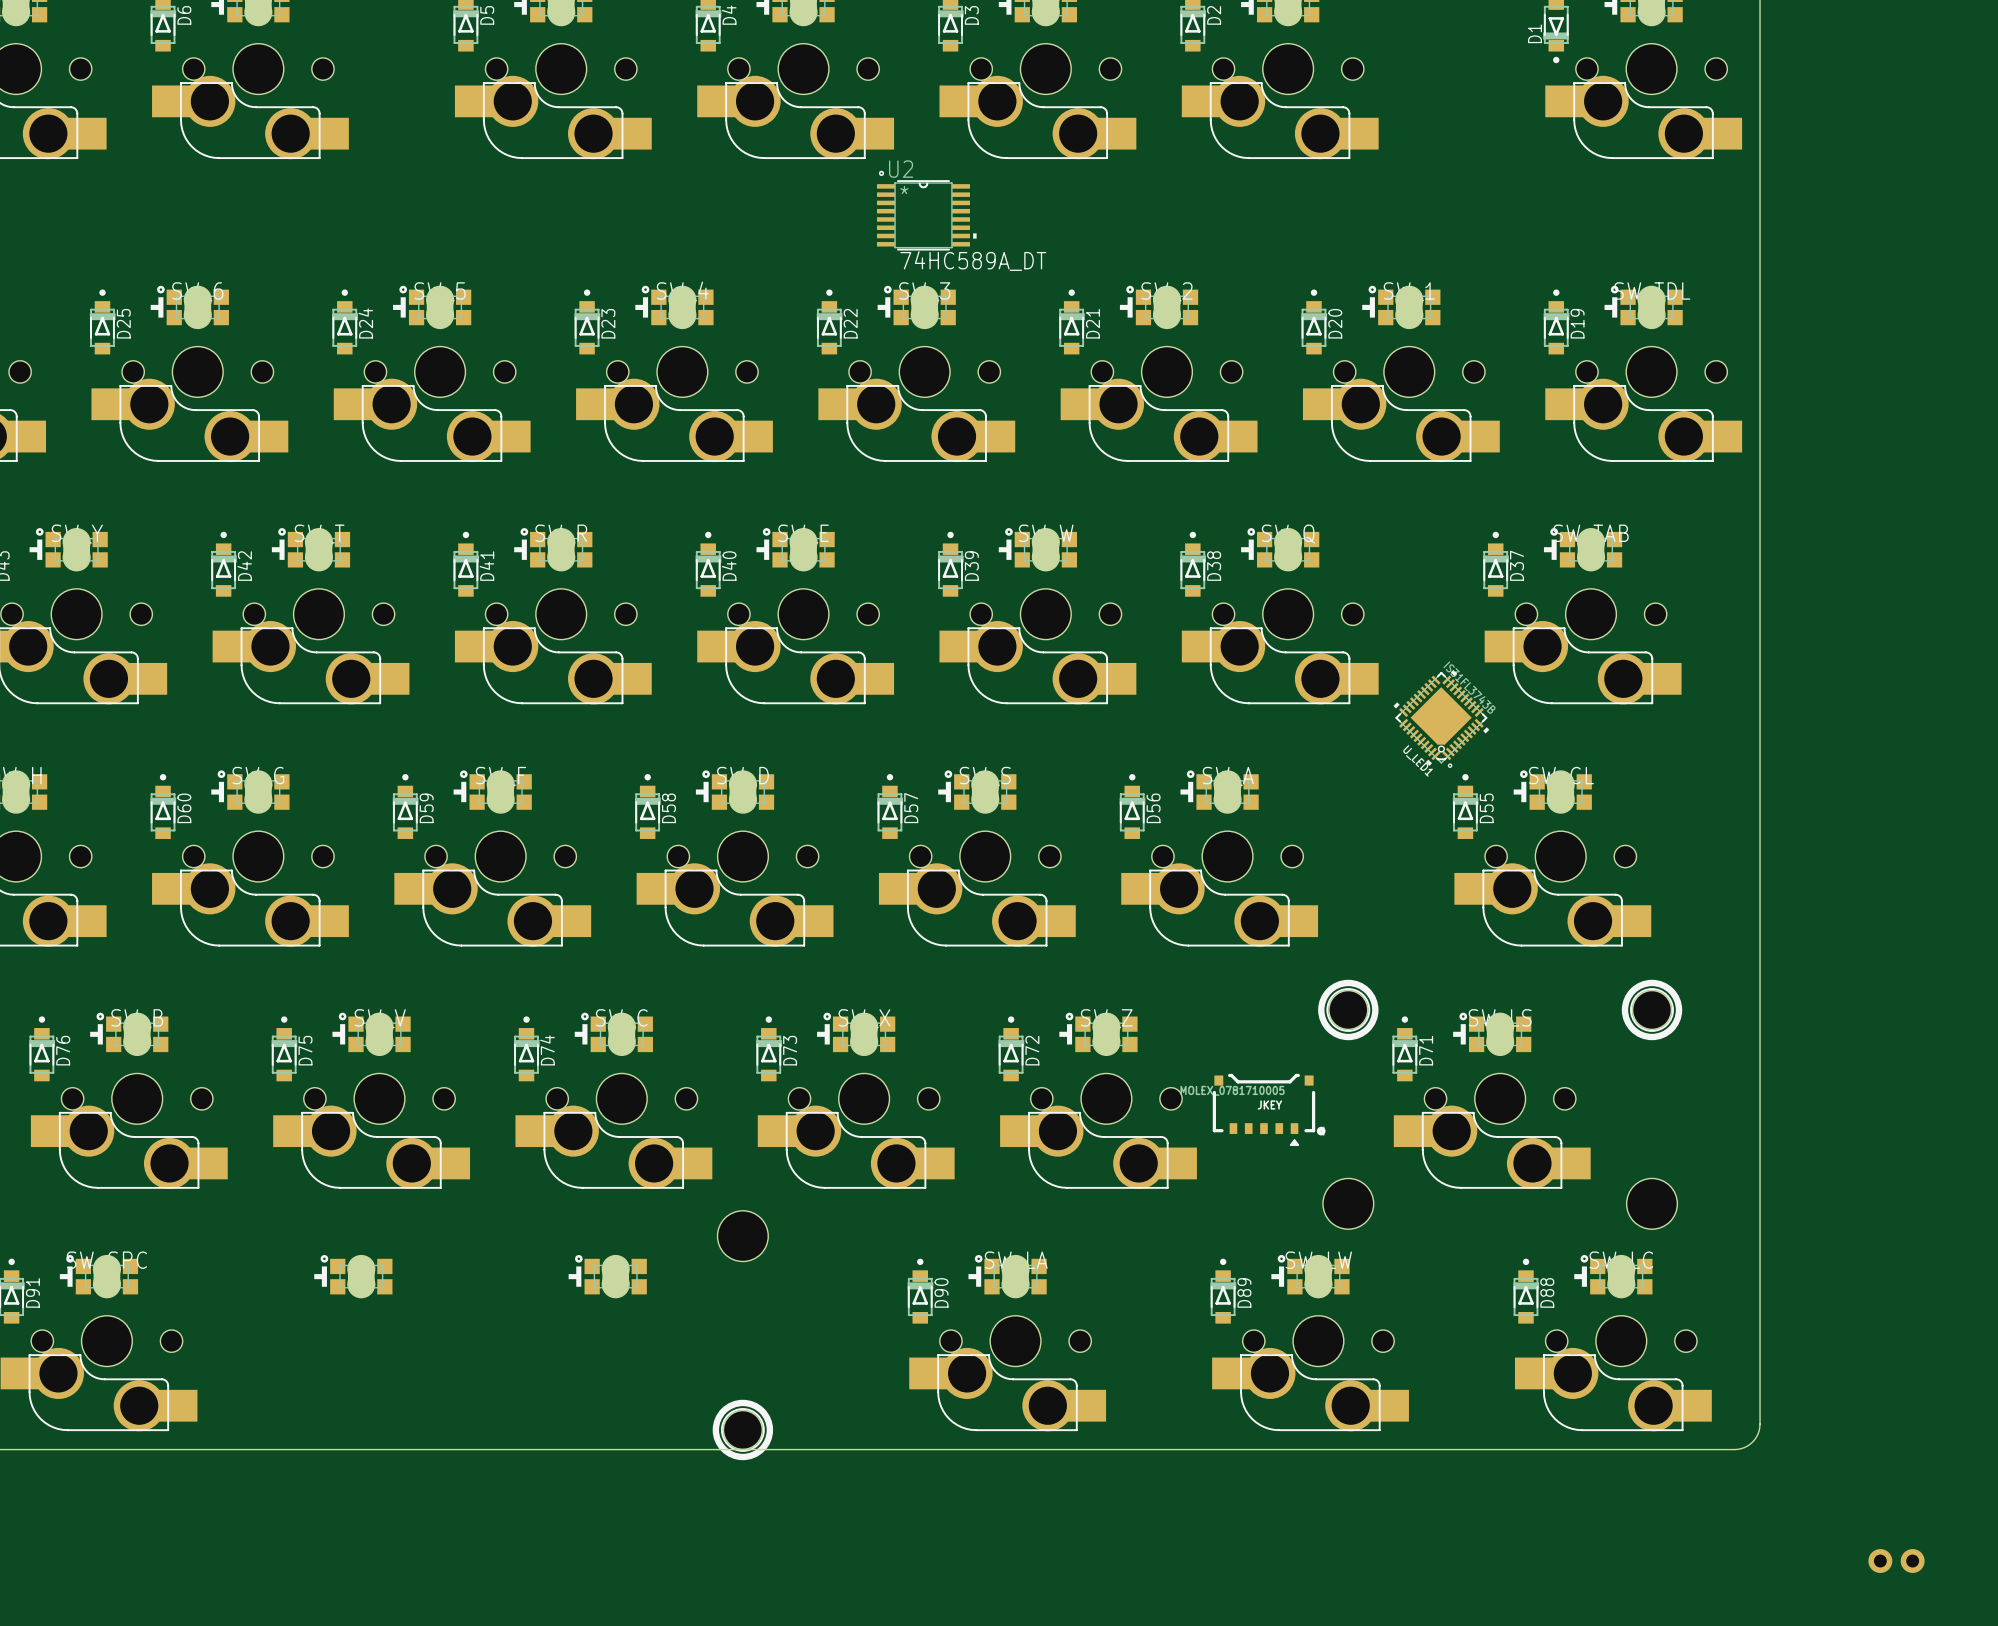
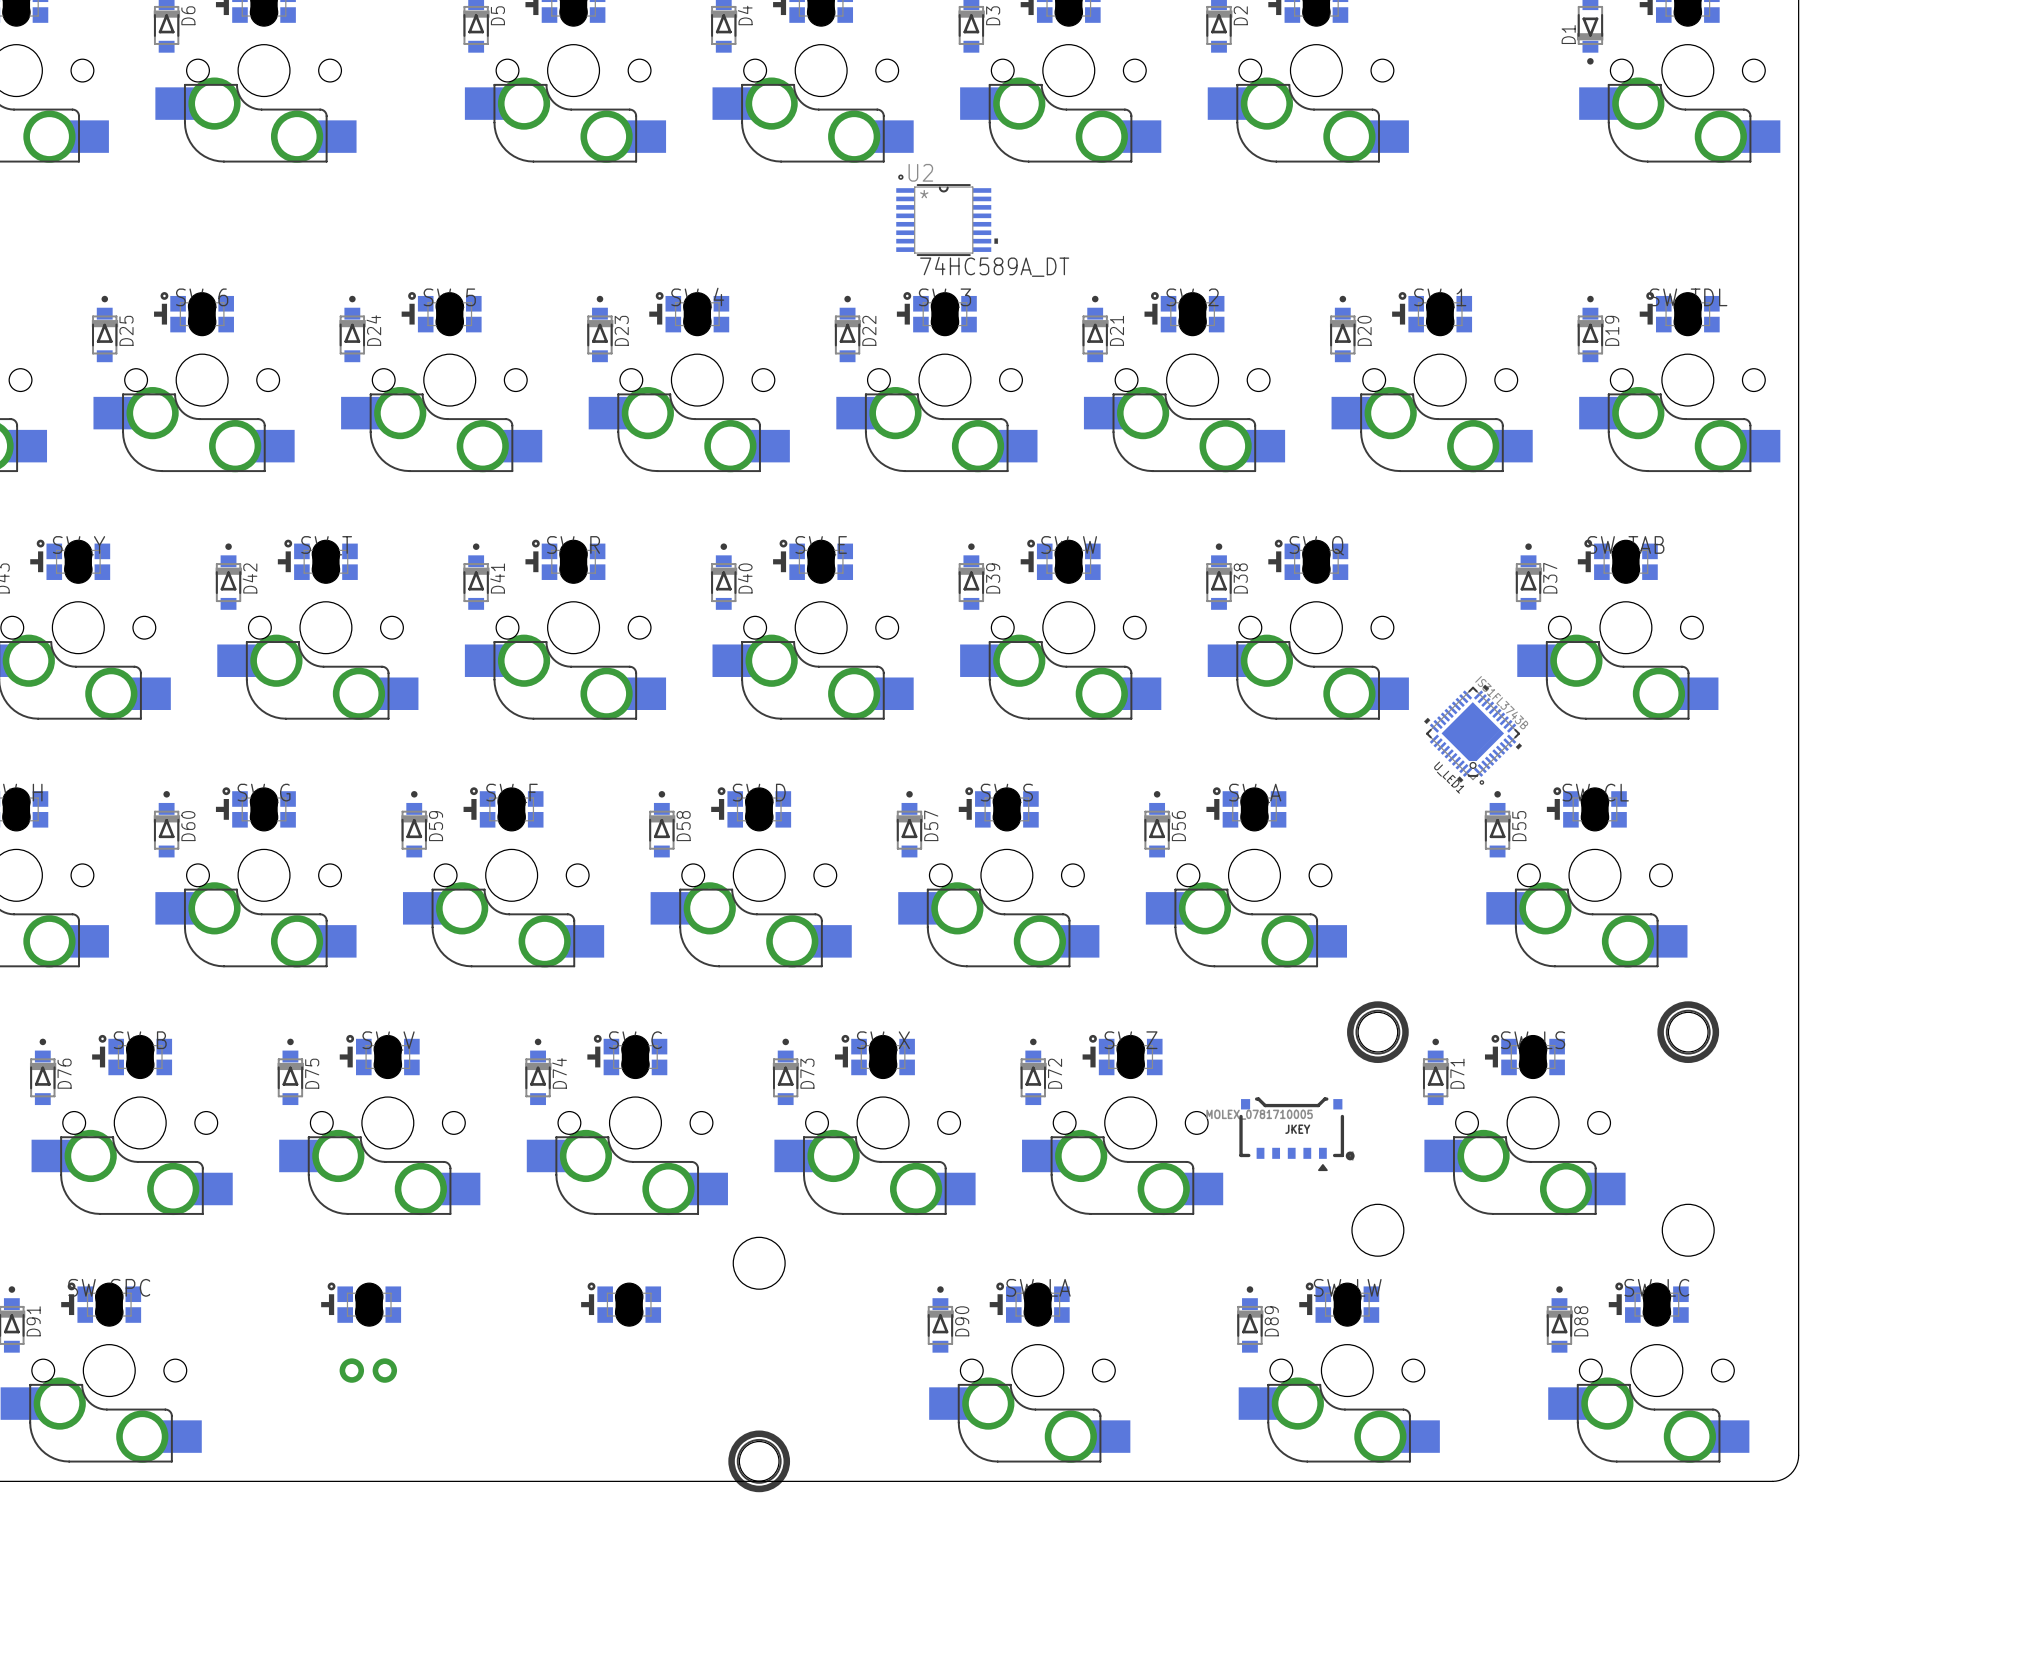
part: none -> (368, 1370)
part: (1896, 1561) -> none

